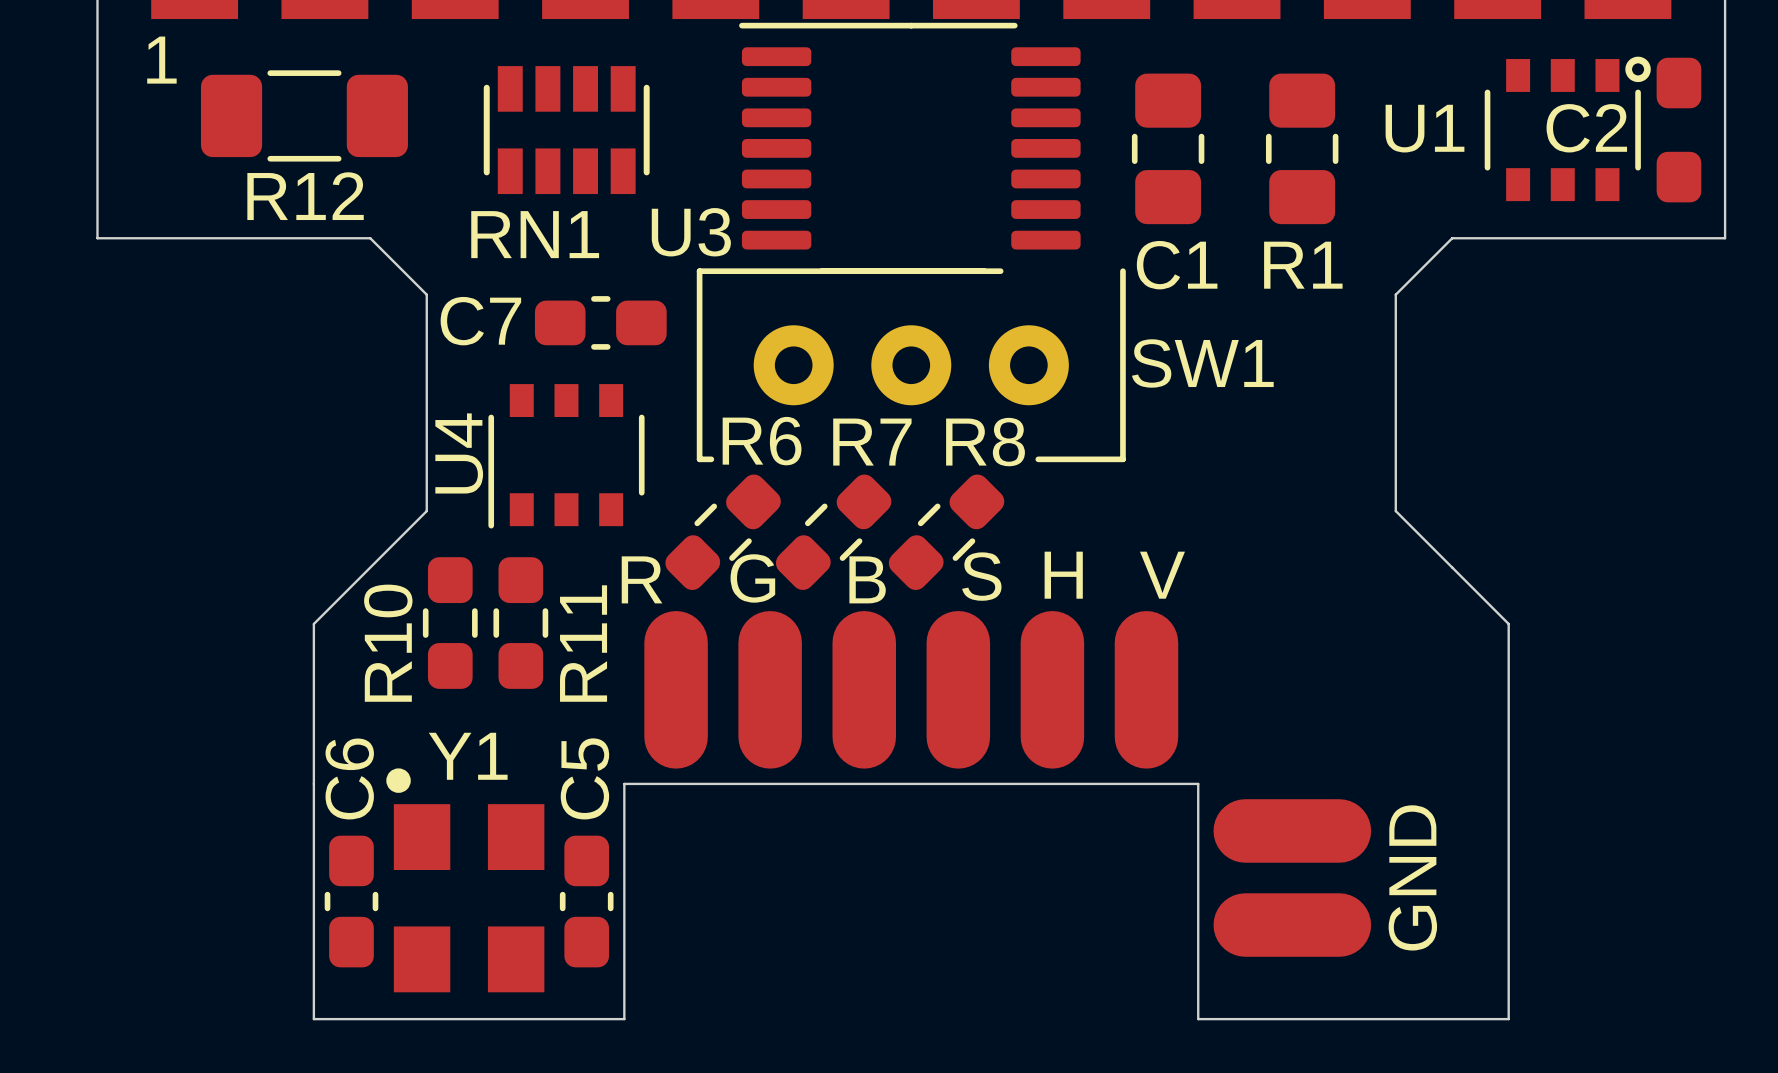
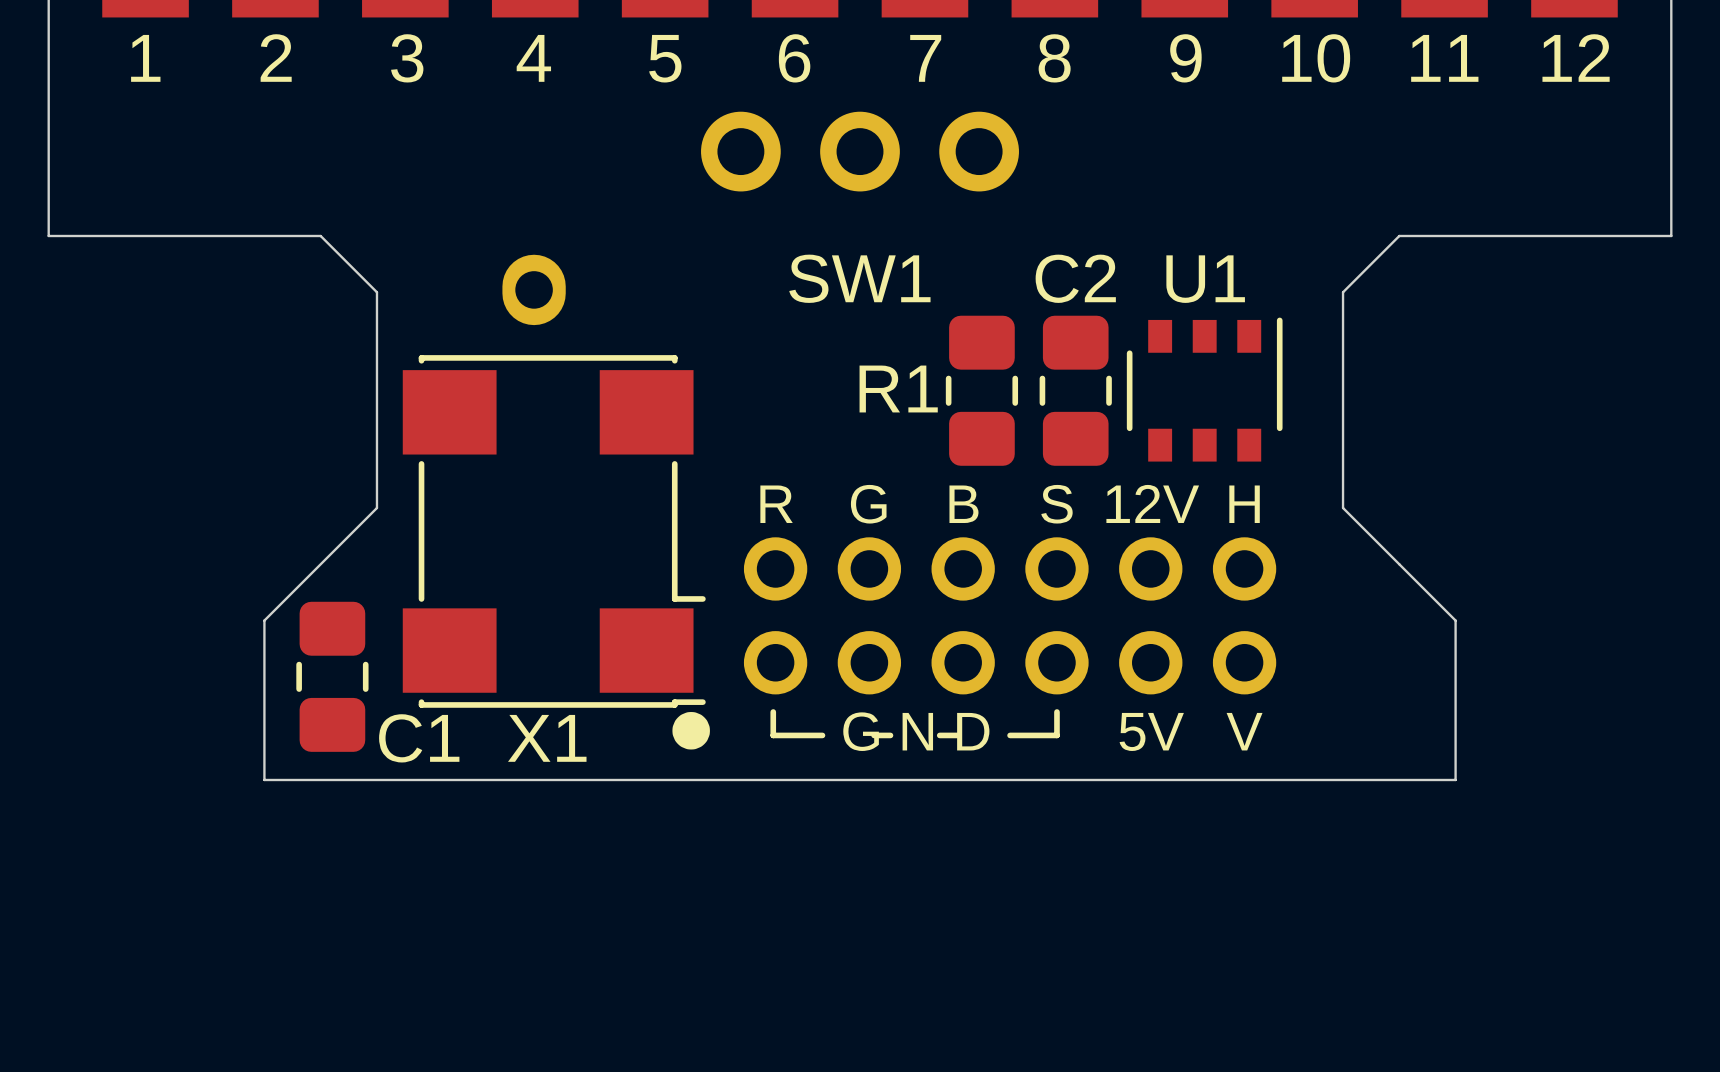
drawing: [1625, 56, 1651, 83] -> none
C2 footprint: [1656, 57, 1702, 203] -> [1039, 315, 1112, 466]
text: none -> 2 (276, 58)
U1 footprint: [1484, 59, 1641, 202] -> [1126, 317, 1283, 462]
text: none -> 12 (1576, 58)
text position: 1 (161, 60) -> 1 (145, 58)
text: none -> 3 (407, 58)
text: none -> 4 (533, 58)
text: none -> 5 (665, 58)
text: none -> 6 (794, 58)
text: none -> 7 (925, 58)
text: none -> 8 (1054, 58)
text: none -> 9 (1185, 58)
text: none -> 10 (1316, 58)
text: none -> 11 (1444, 58)
R12: (304, 115) -> none
U1 name position: U1 (1424, 128) -> U1 (1205, 279)
C2 name position: C2 (1586, 128) -> C2 (1075, 278)
RN1: (566, 130) -> none
U3: (909, 148) -> none
C1 position: (1168, 148) -> (332, 676)
R1 position: (1302, 148) -> (981, 390)
C1 name position: C1 (1177, 265) -> C1 (419, 738)
R1 name position: R1 (1303, 265) -> R1 (898, 389)
line: (984, 271) (699, 271) (699, 459) (711, 459) -> none
line: (1122, 271) (1122, 459) (1038, 459) -> none
part: none -> (534, 289)
C7: (600, 322) -> none
SW1 footprint: [753, 325, 1069, 406] -> [701, 111, 1019, 192]
SW1 name position: SW1 (1202, 363) -> SW1 (859, 278)
U4: (566, 456) -> none
text: none -> 12V (1152, 503)
R6: (723, 532) -> none
R7: (833, 532) -> none
R8: (946, 532) -> none
X1: none -> (554, 531)
text position: H (1063, 575) -> H (1244, 504)
text position: V (1162, 575) -> V (1244, 731)
text position: S (981, 576) -> S (1056, 504)
text position: G (752, 578) -> G (868, 504)
text position: R (642, 579) -> R (776, 504)
text position: B (867, 579) -> B (963, 504)
part: none -> (1010, 615)
R10: (450, 623) -> none
R11: (520, 623) -> none
part: (911, 689) -> none
drawing: none -> [672, 711, 710, 750]
line: none -> (773, 711) (773, 735) (822, 735)
line: none -> (1056, 711) (1056, 735) (1010, 735)
text: none -> G N D (916, 731)
text: none -> 5V (1151, 731)
line: none -> (874, 735) (890, 735)
line: none -> (939, 735) (958, 735)
board edge: (313, 783) (313, 1019) (624, 1019) (624, 783) -> (264, 779) (573, 779)
board edge: (1198, 783) (1198, 1019) (1508, 1019) (1508, 783) -> (1146, 779) (1455, 779)
text: GND (1412, 877) -> none
part: (1292, 878) -> none
Y1: (465, 880) -> none
C6: (351, 901) -> none
C5: (586, 901) -> none

